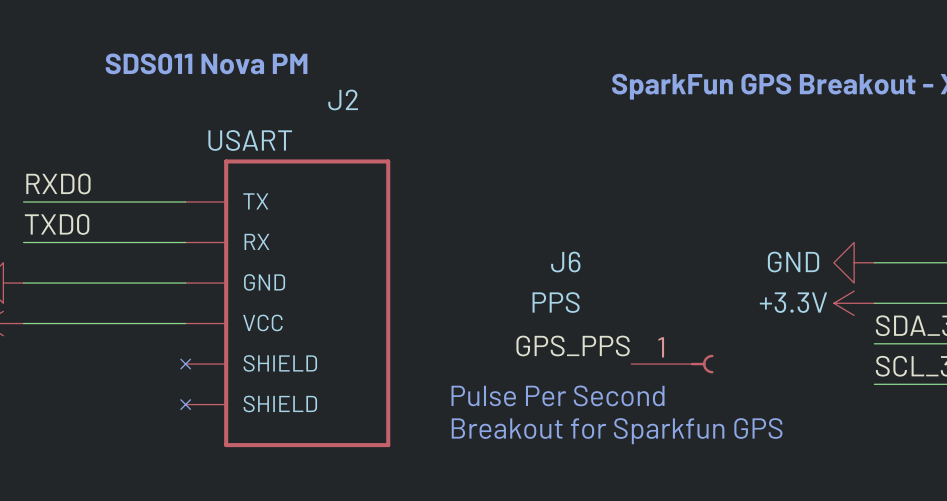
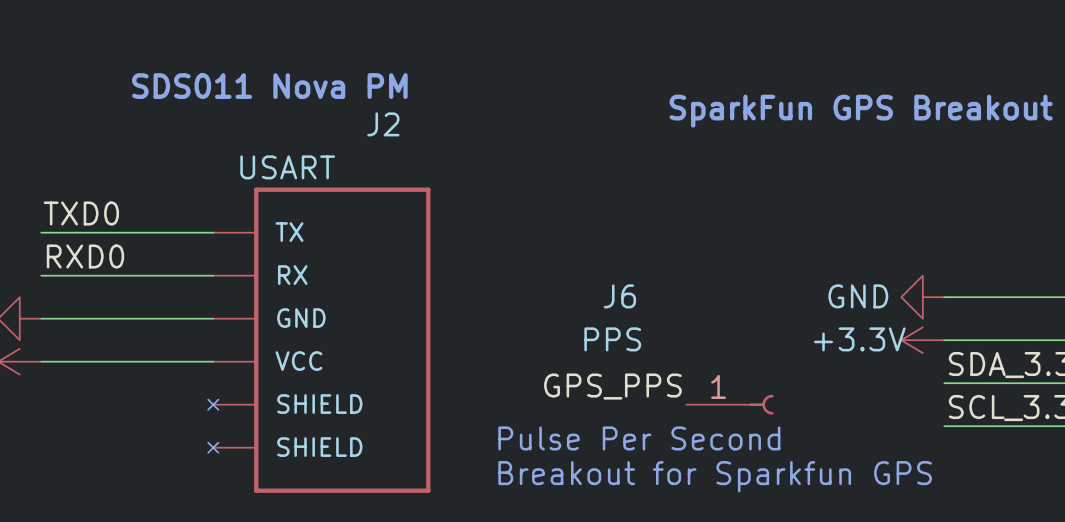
label: RXD0 (58, 183) -> TXD0 (81, 213)
label: TXD0 (57, 224) -> RXD0 (85, 256)

